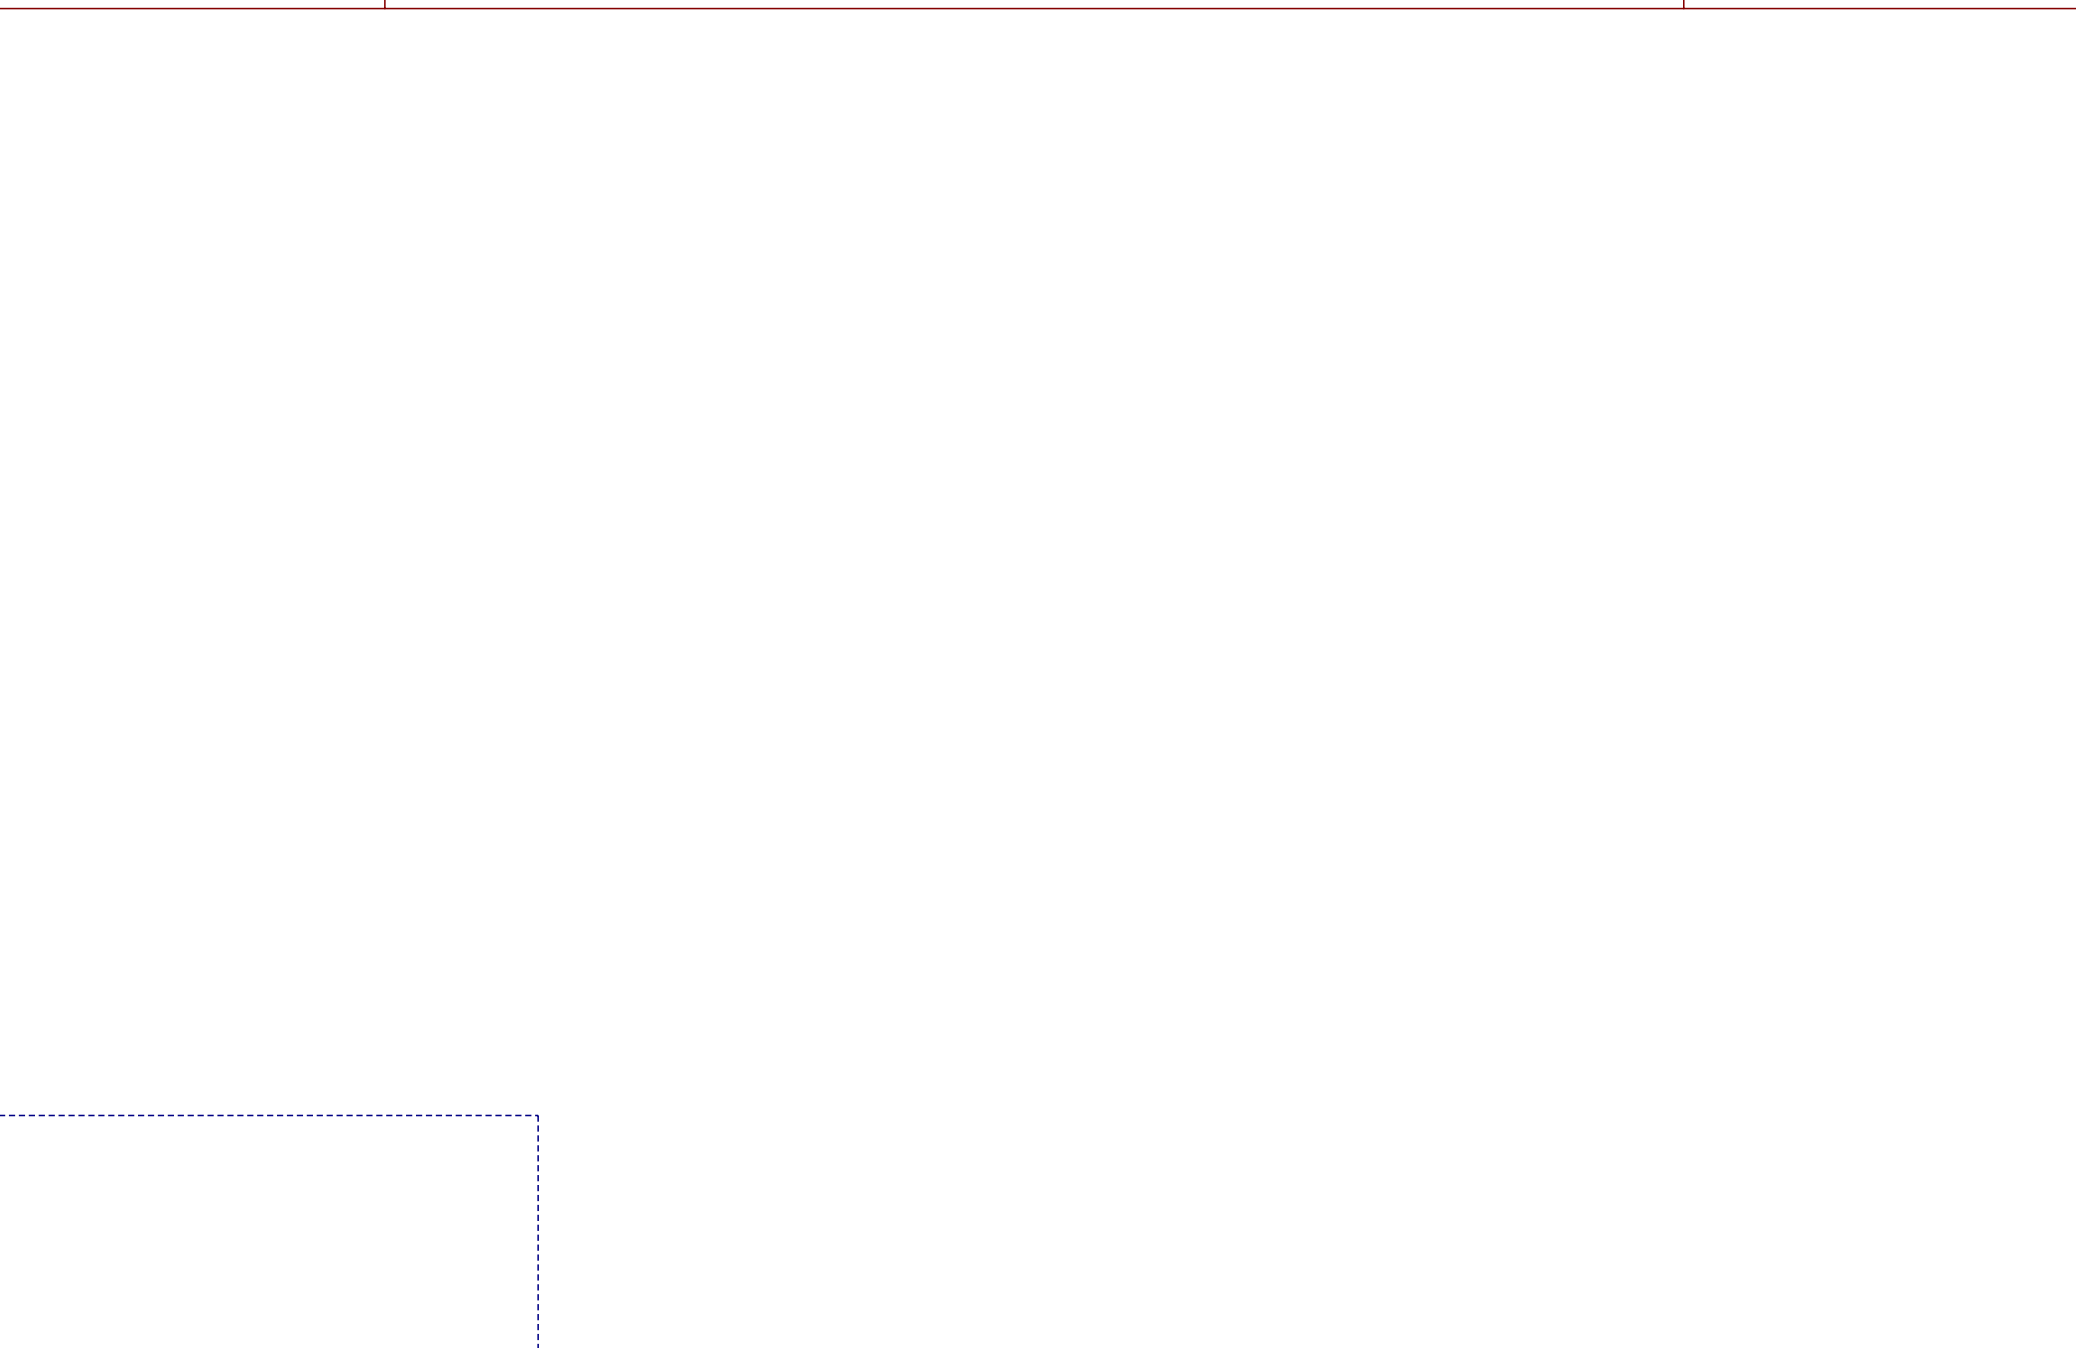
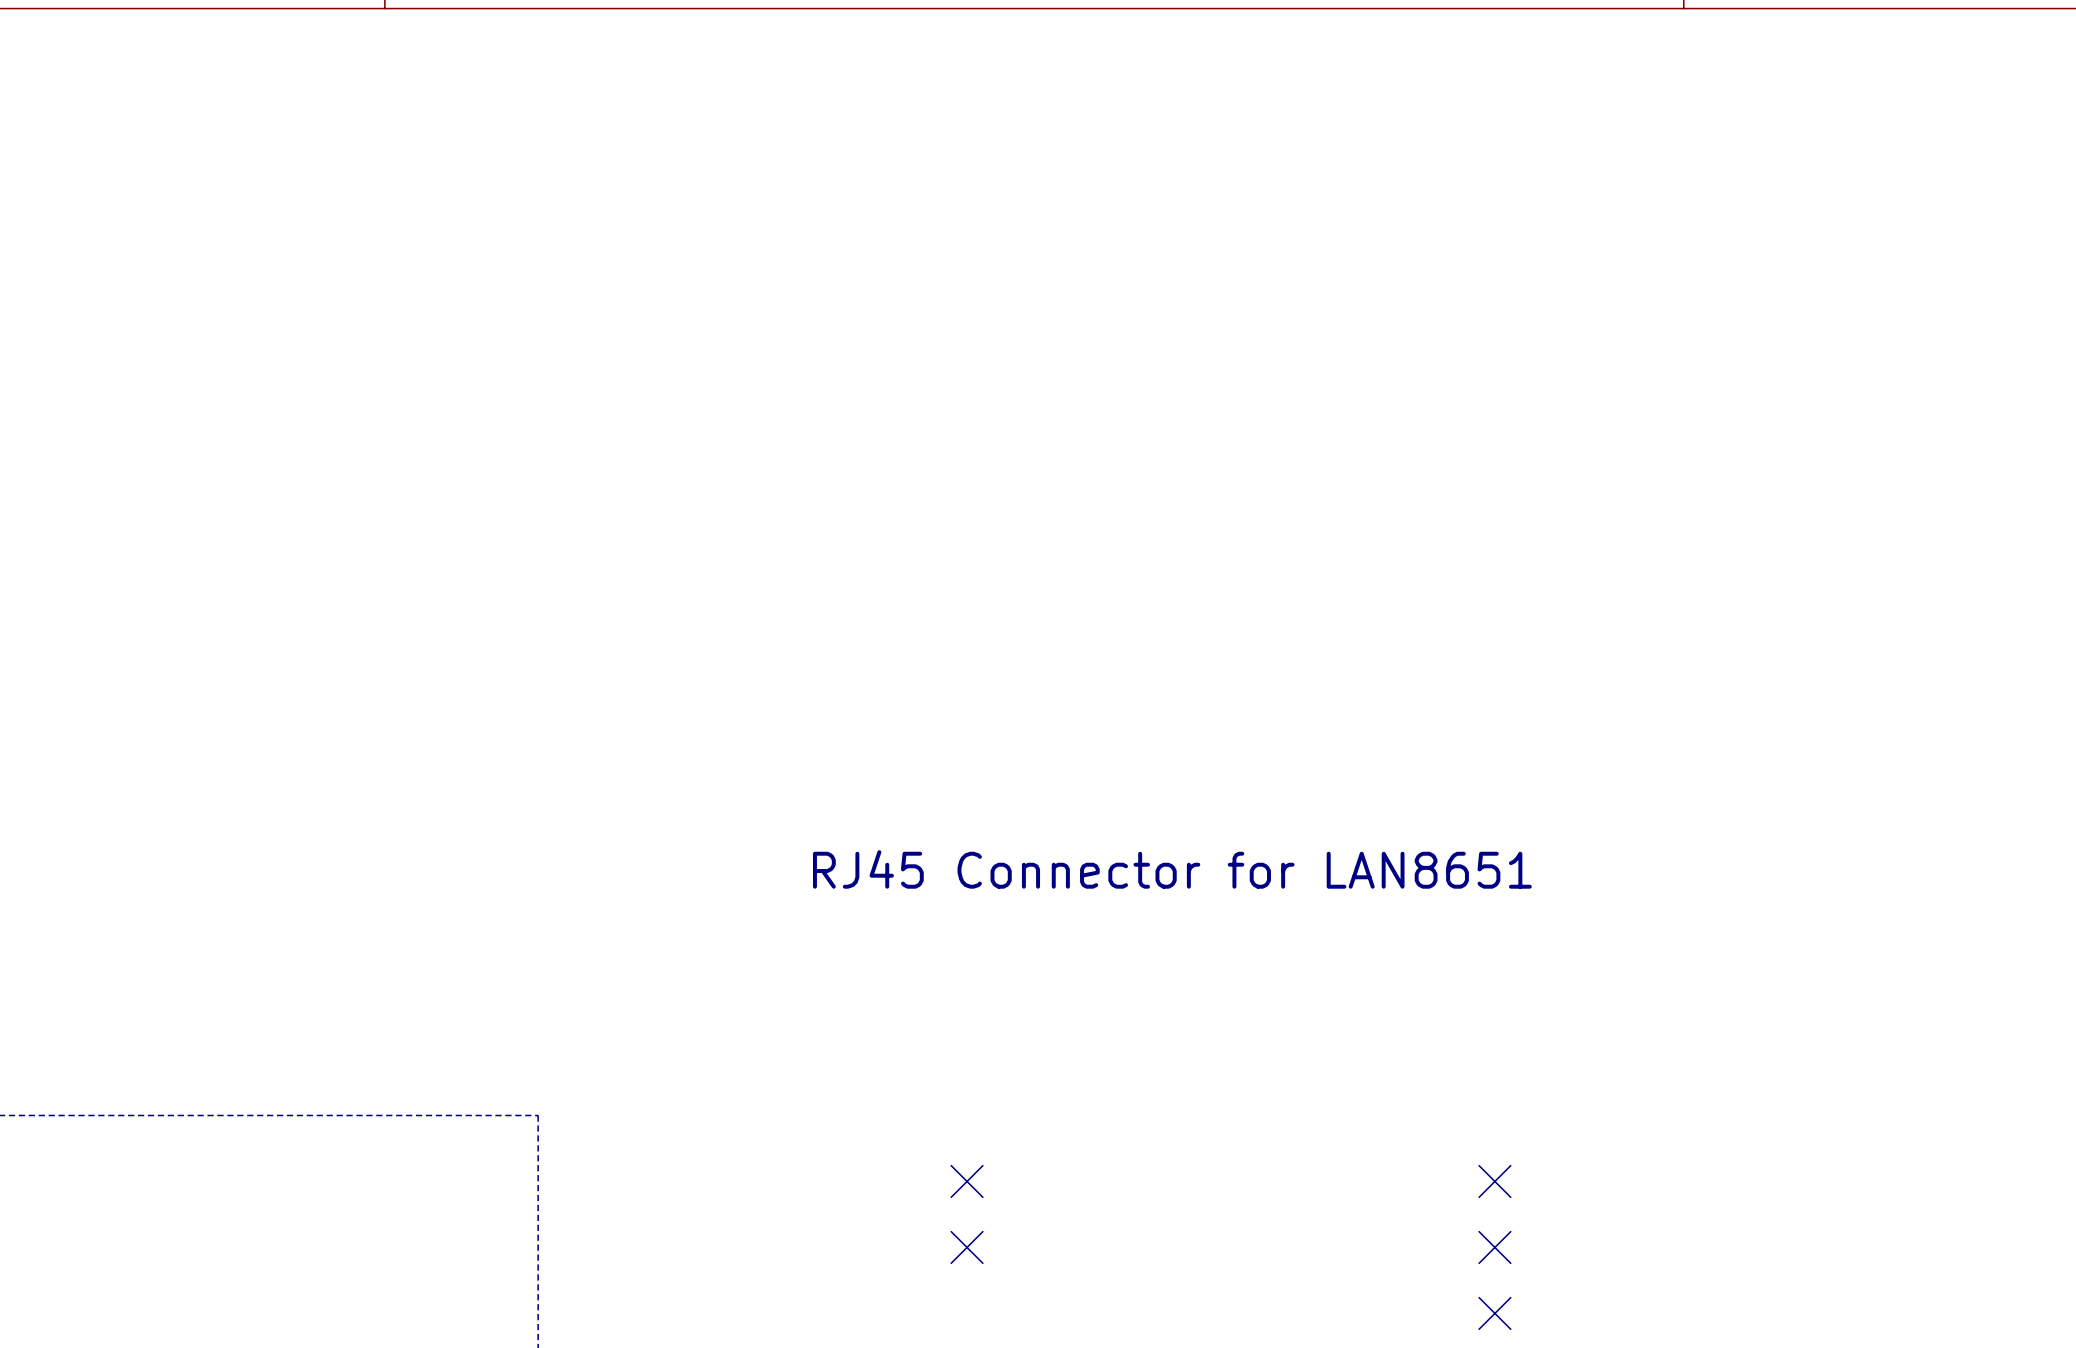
text: none -> RJ45 Connector for LAN8651 (1172, 869)
no-connect mark: none -> (967, 1181)
no-connect mark: none -> (1494, 1181)
no-connect mark: none -> (967, 1247)
no-connect mark: none -> (1494, 1247)
no-connect mark: none -> (1494, 1313)

